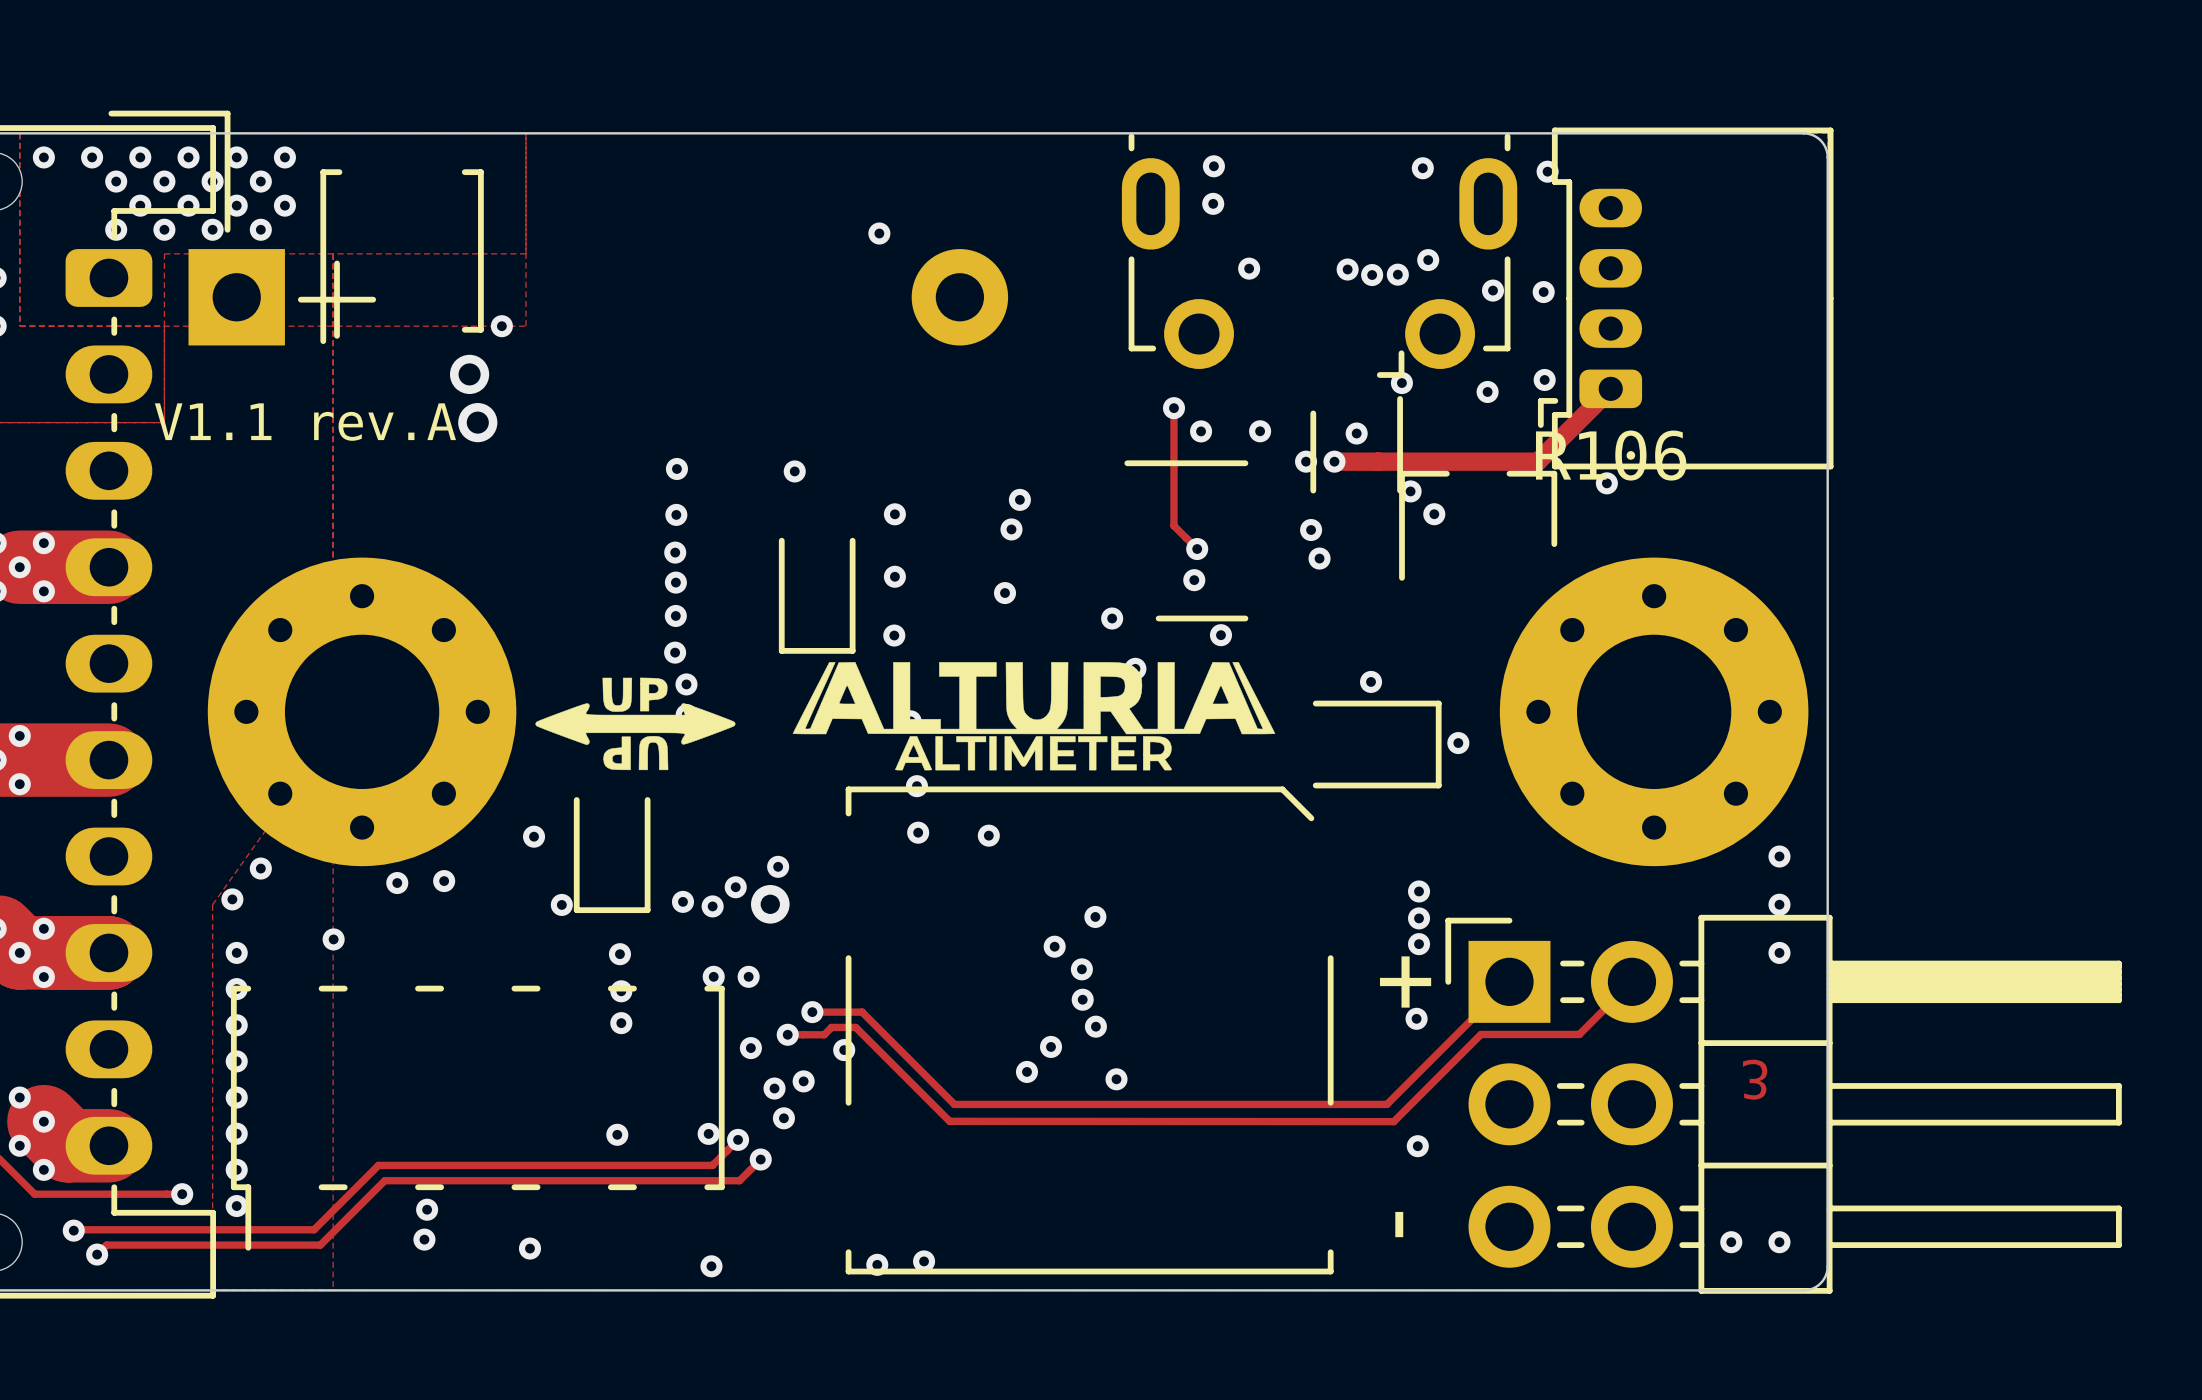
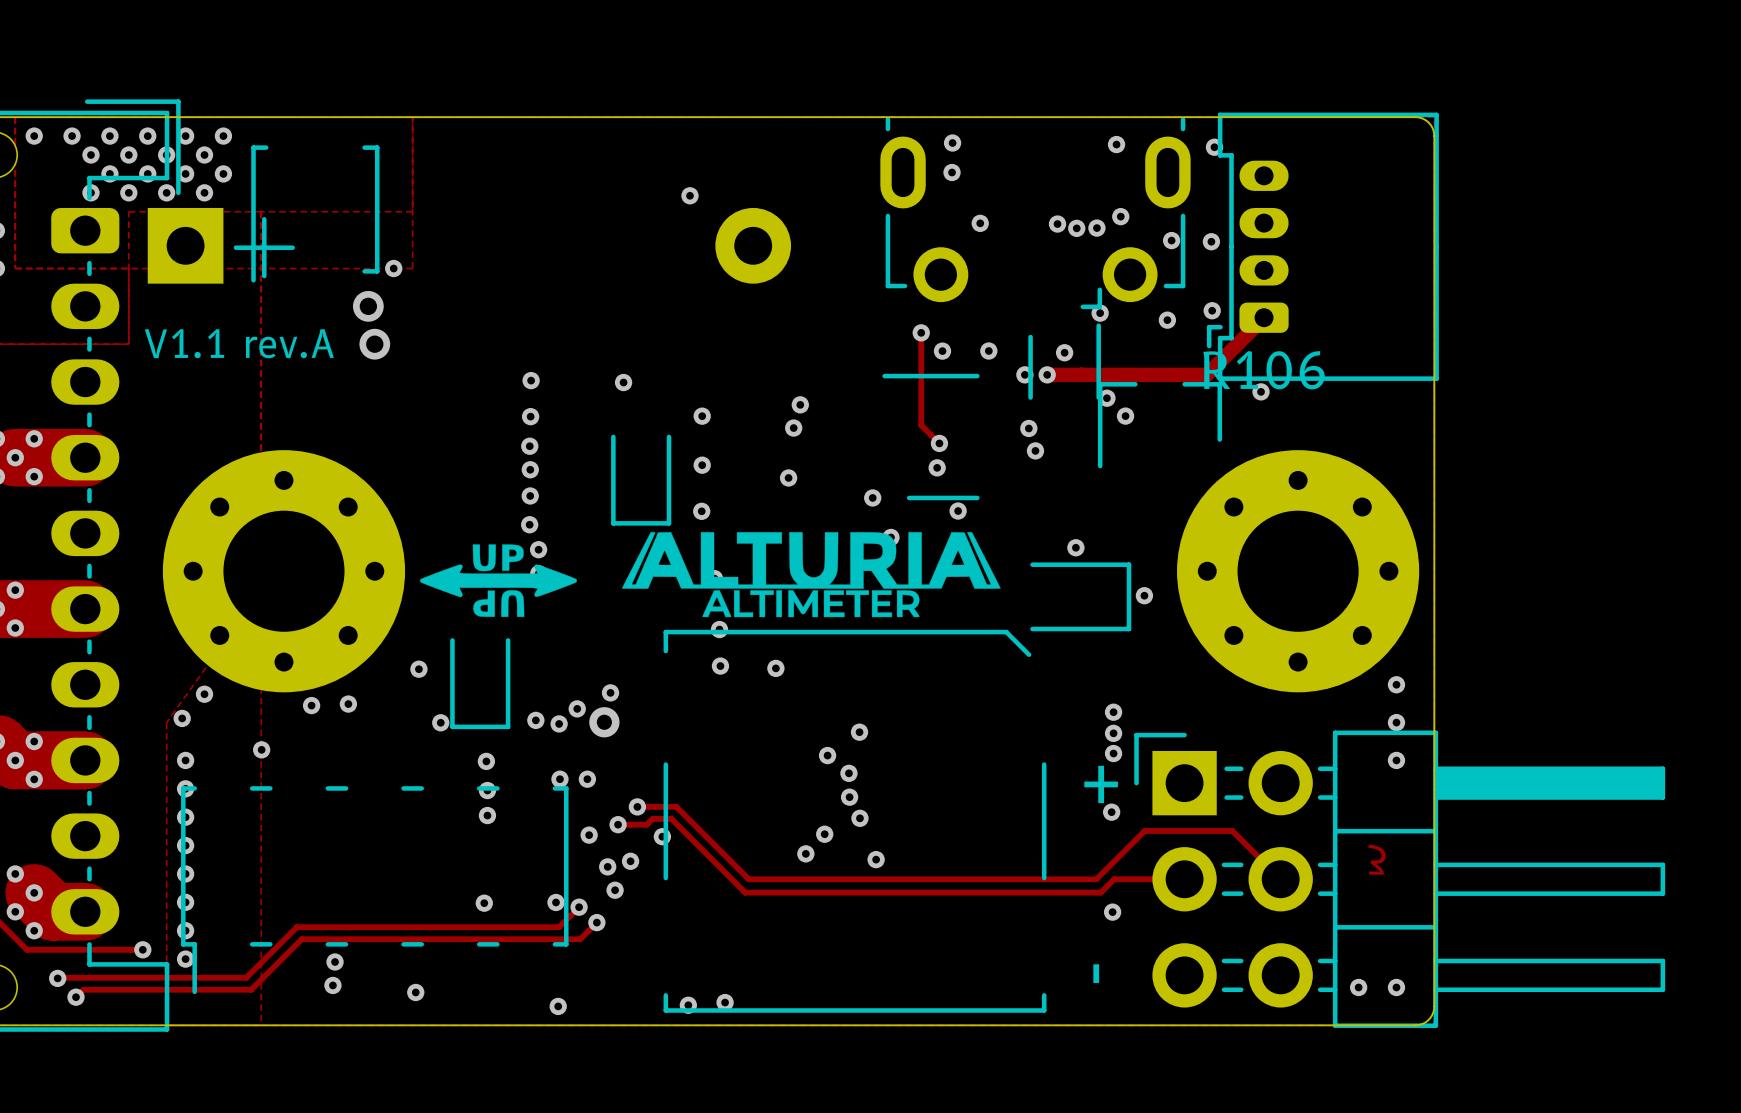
track: (1509, 981) (1386, 1104) -> (1280, 879) (1232, 831) (1144, 831) (1096, 879) (1088, 879)
track: (1631, 981) (1579, 1034) (1480, 1034) (1393, 1121) (949, 1121) -> (1184, 879) (1114, 879) (1100, 892) (745, 892)

